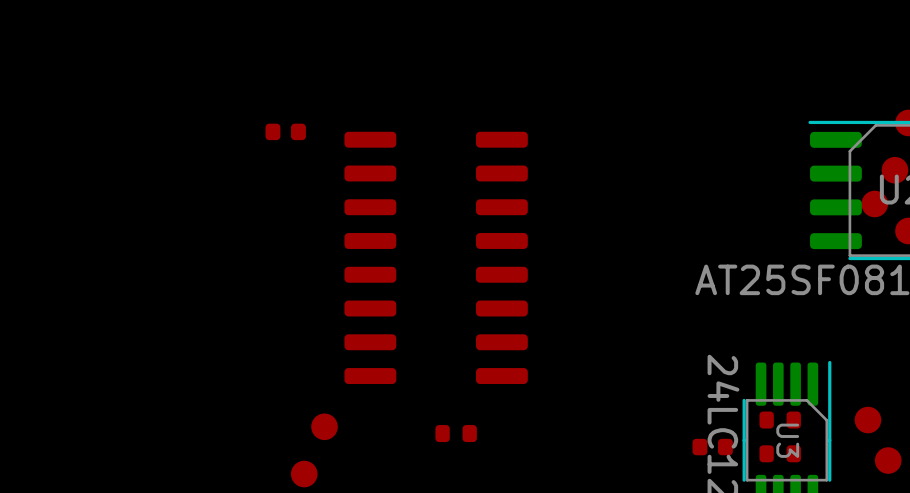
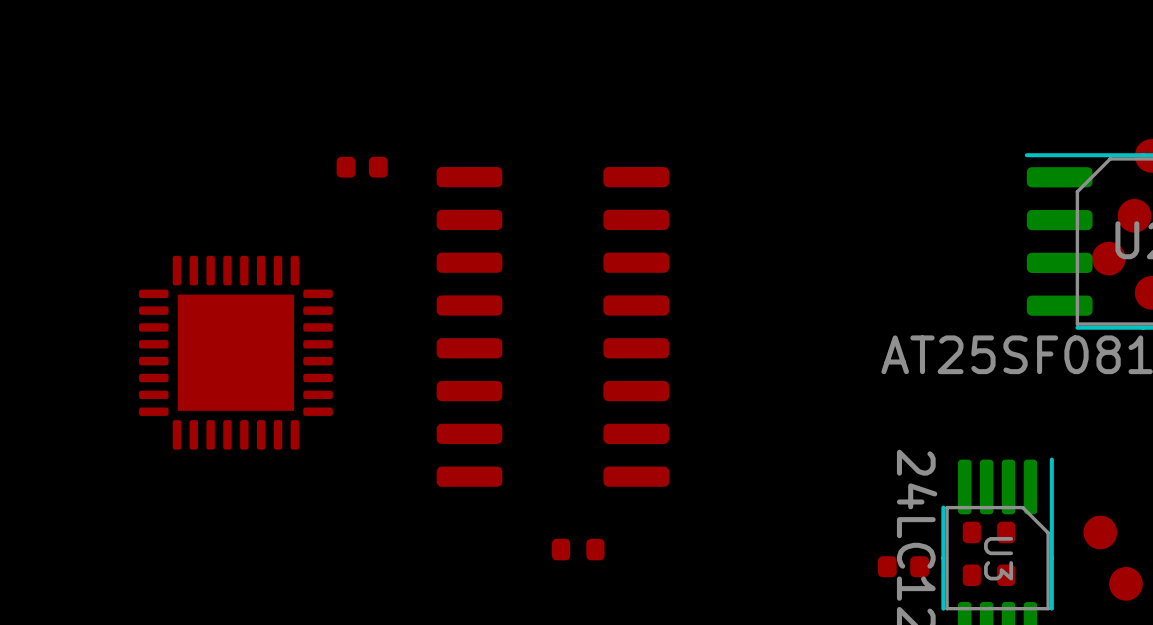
part: none -> (235, 352)
part: (324, 426) -> none
part: (304, 474) -> none

